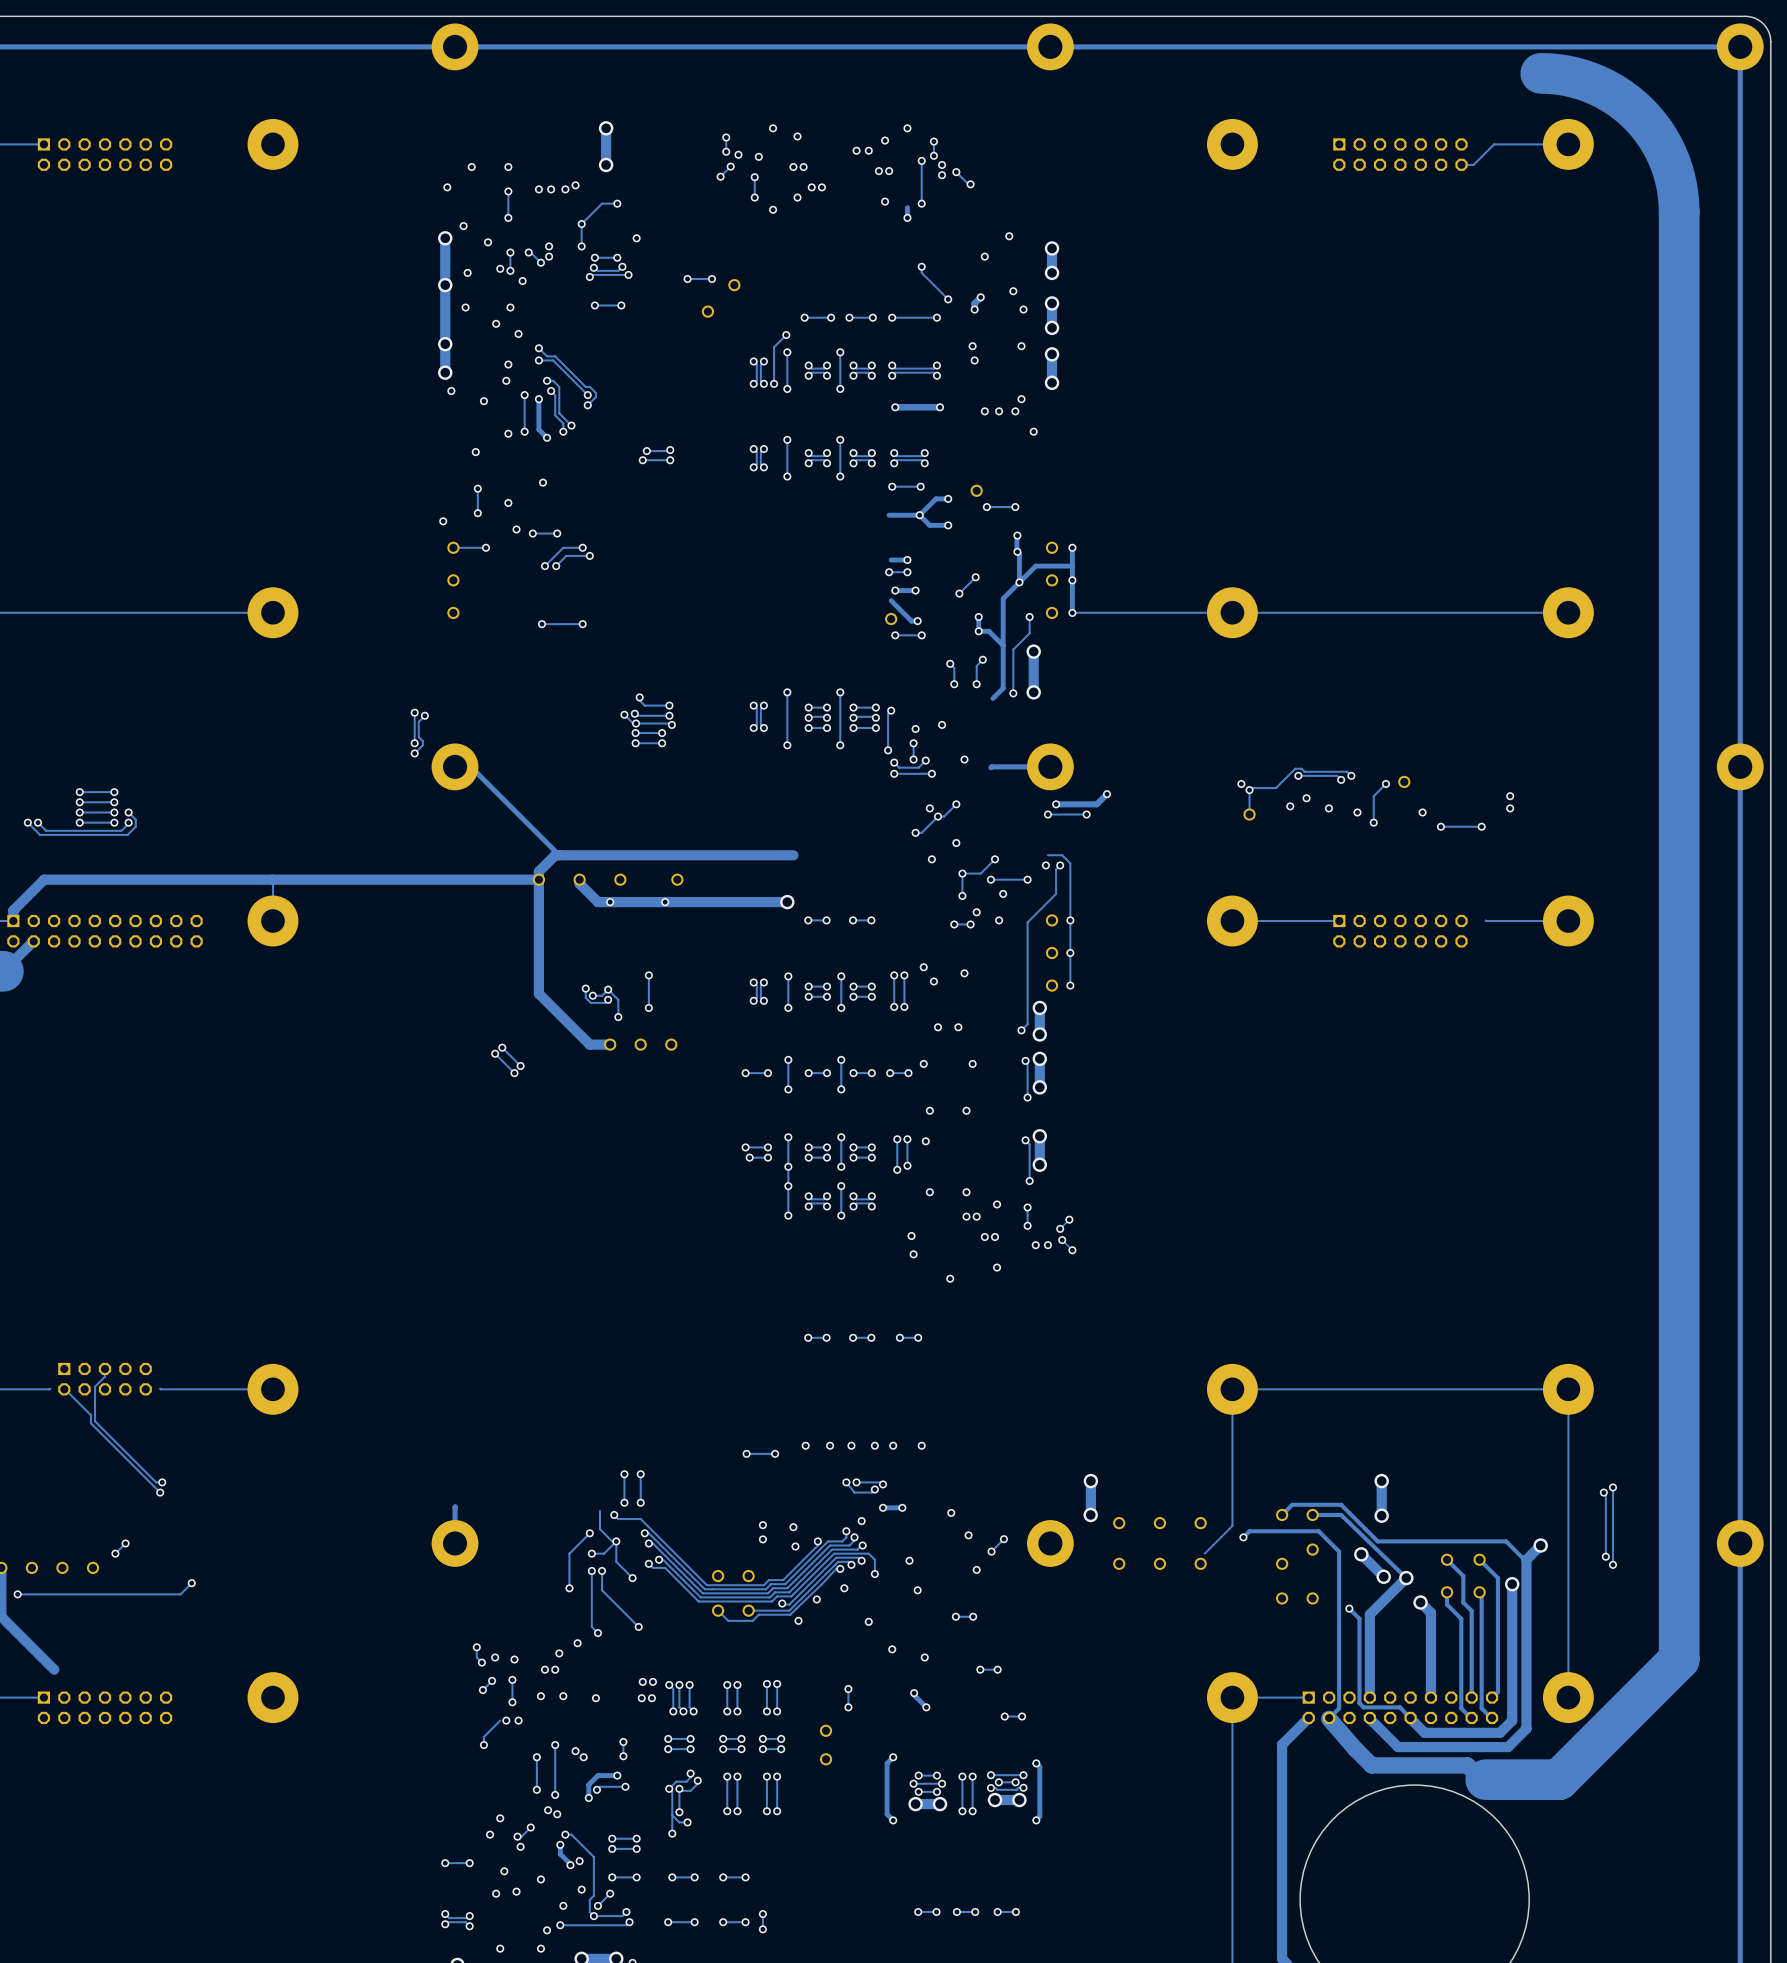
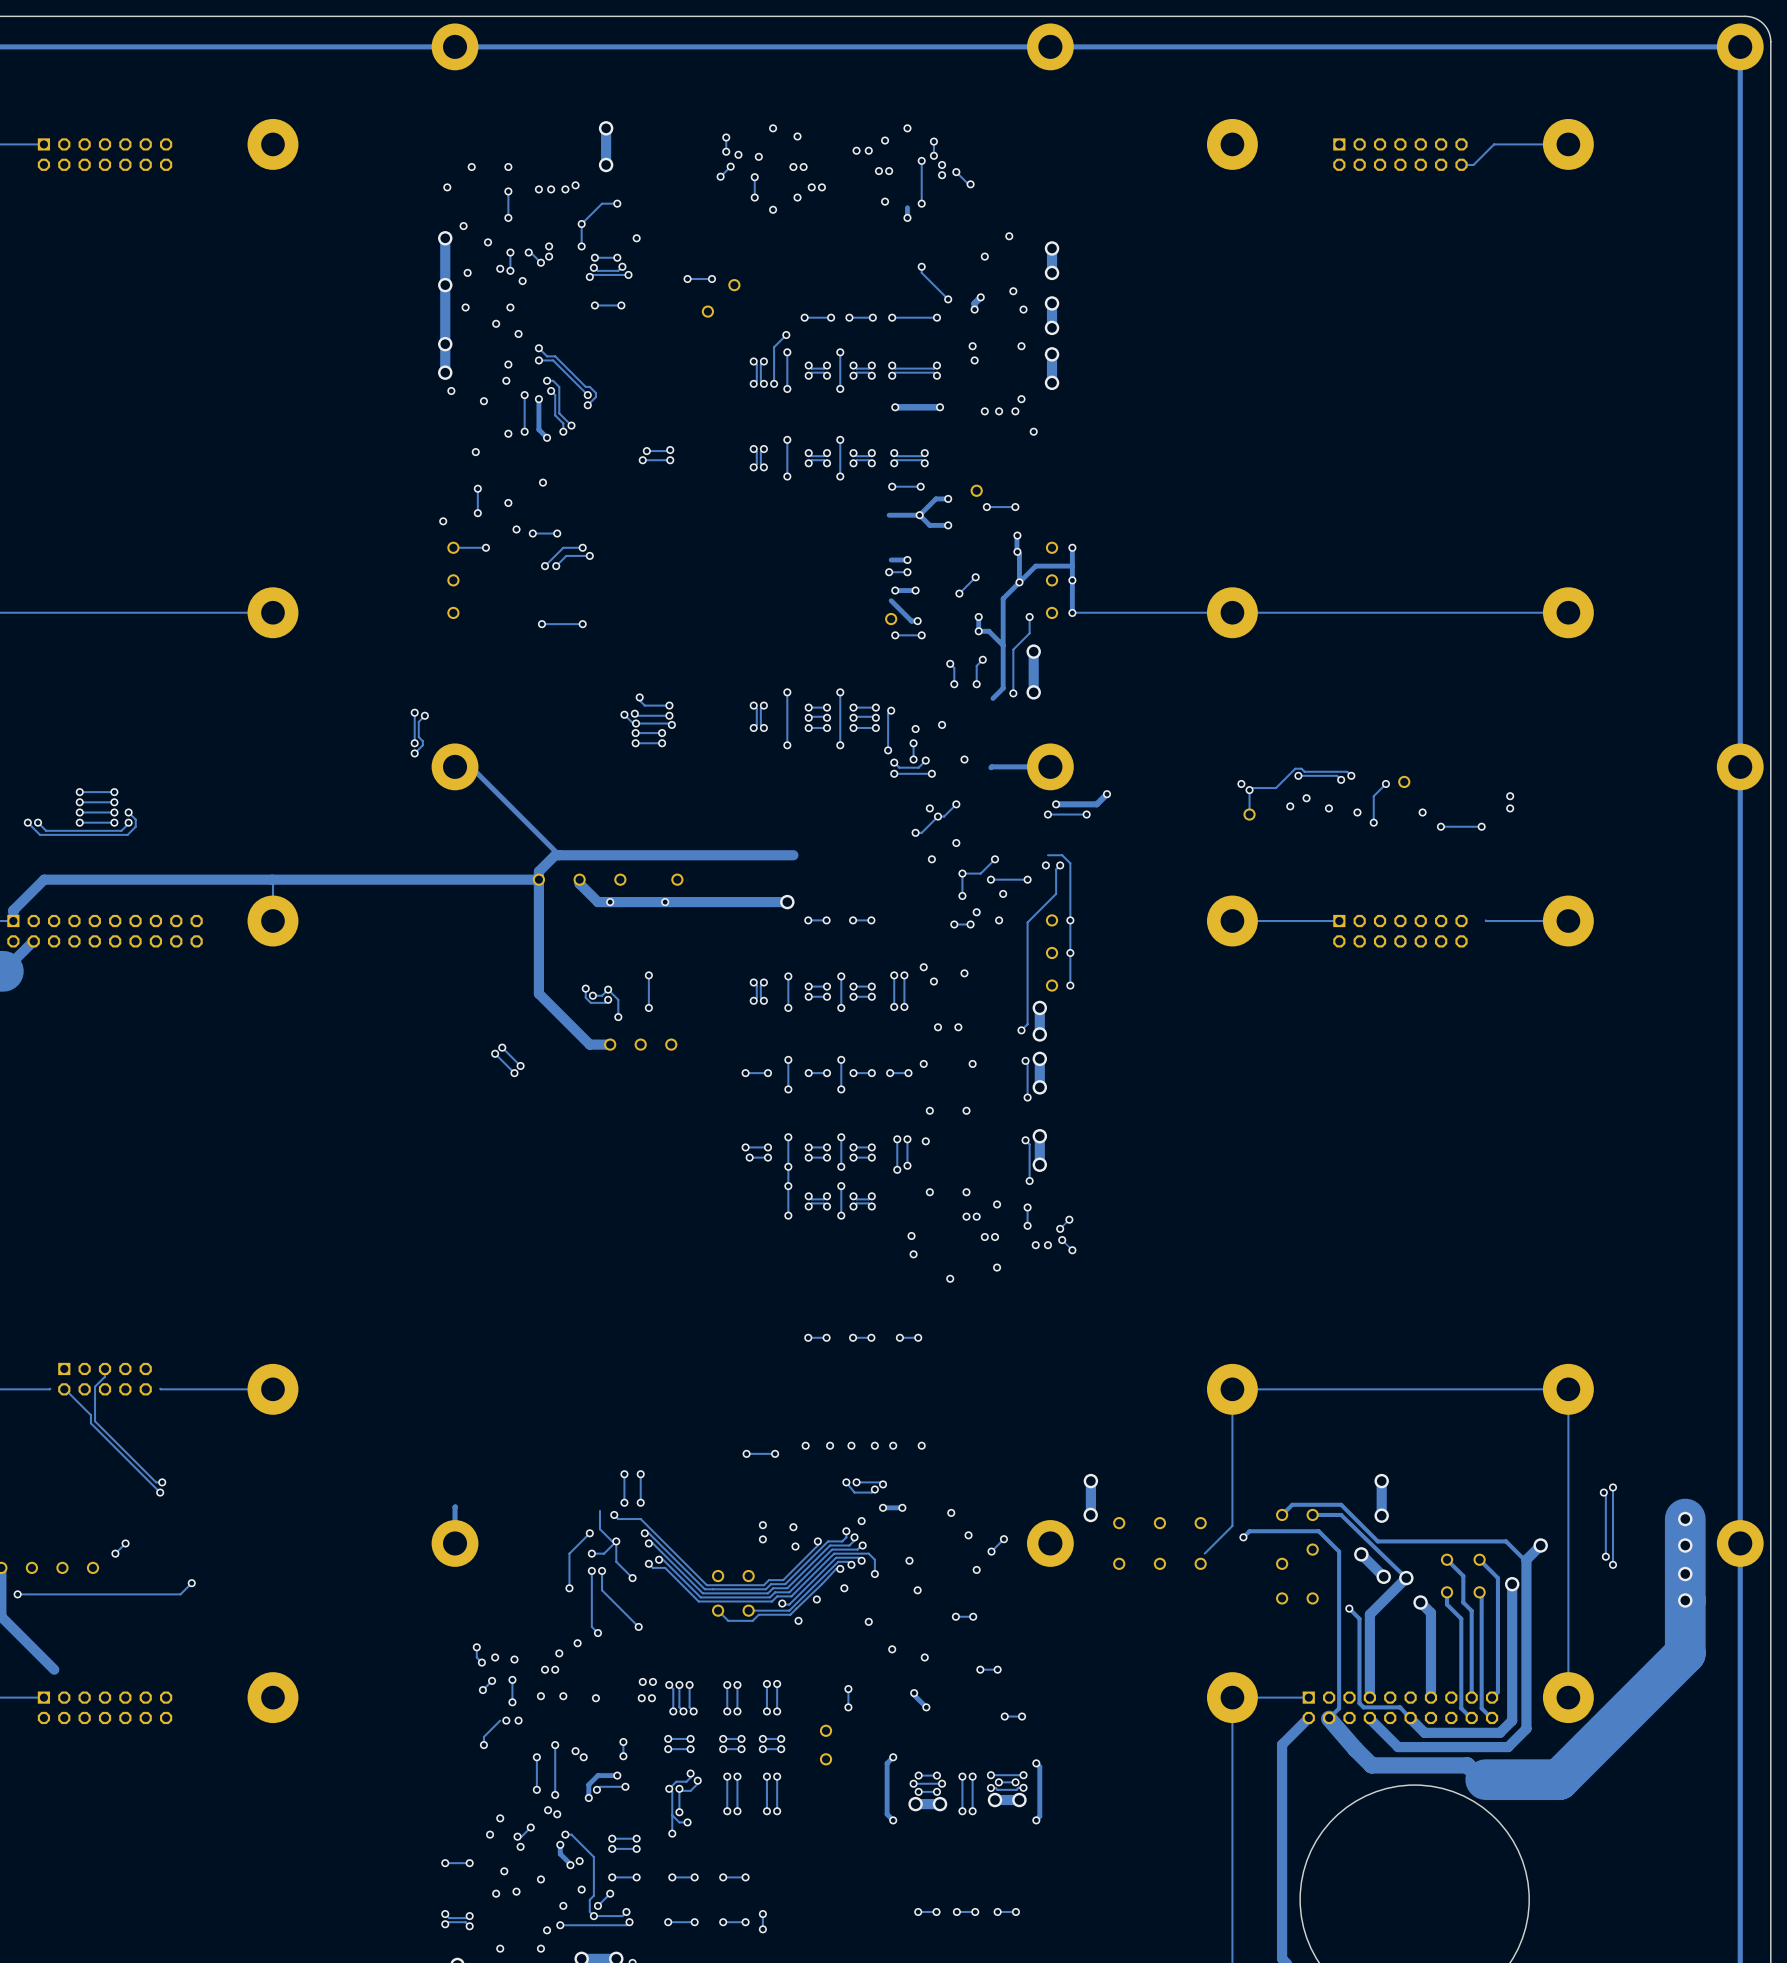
track: (1540, 73) (1565, 75) (1589, 82) (1619, 97) (1638, 113) (1654, 133) (1666, 154) (1675, 178) (1678, 203) (1679, 1659) -> (1685, 1519) (1685, 1653) (1679, 1659)
via: none -> (1685, 1519)
via: none -> (1685, 1545)
via: none -> (1685, 1574)
via: none -> (1685, 1600)

